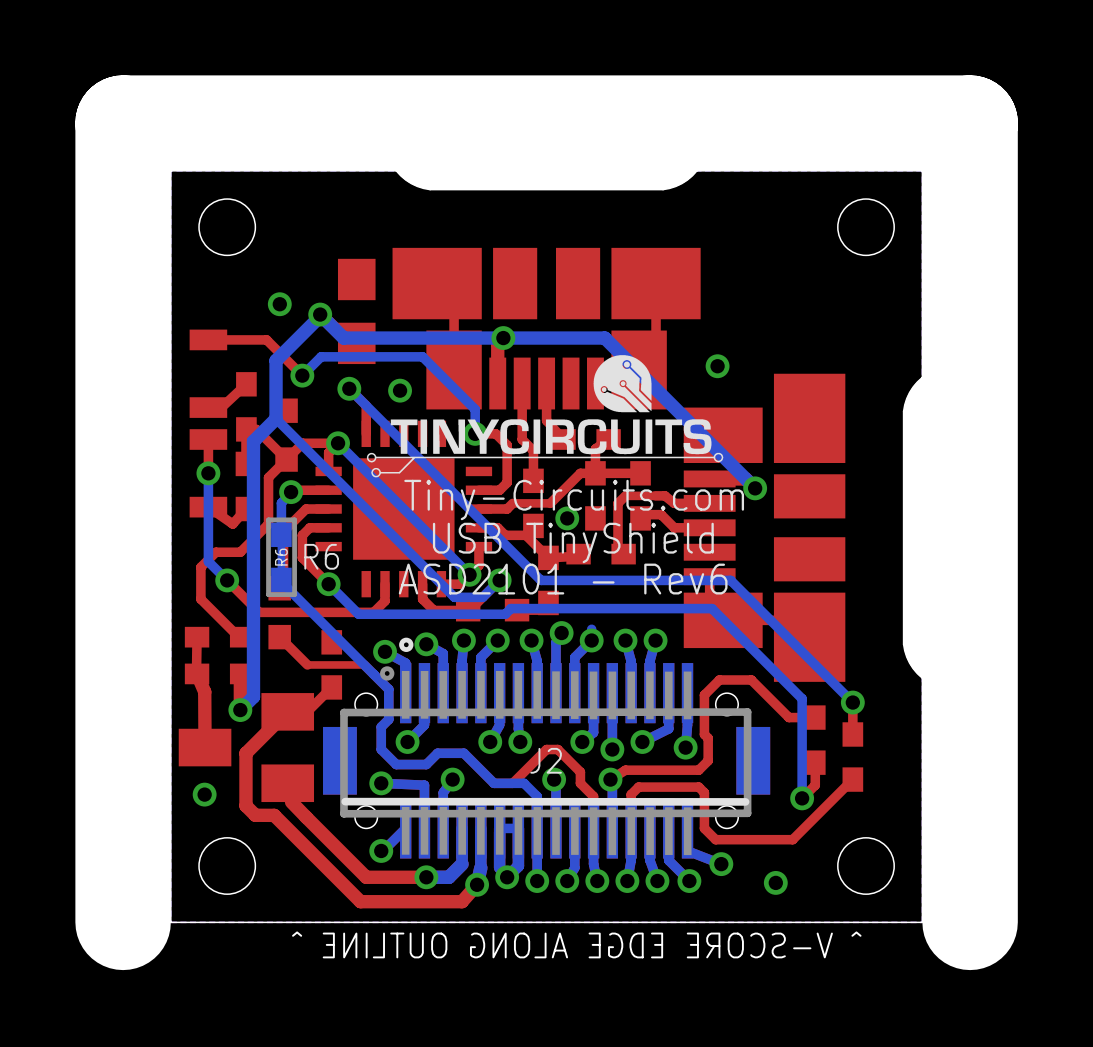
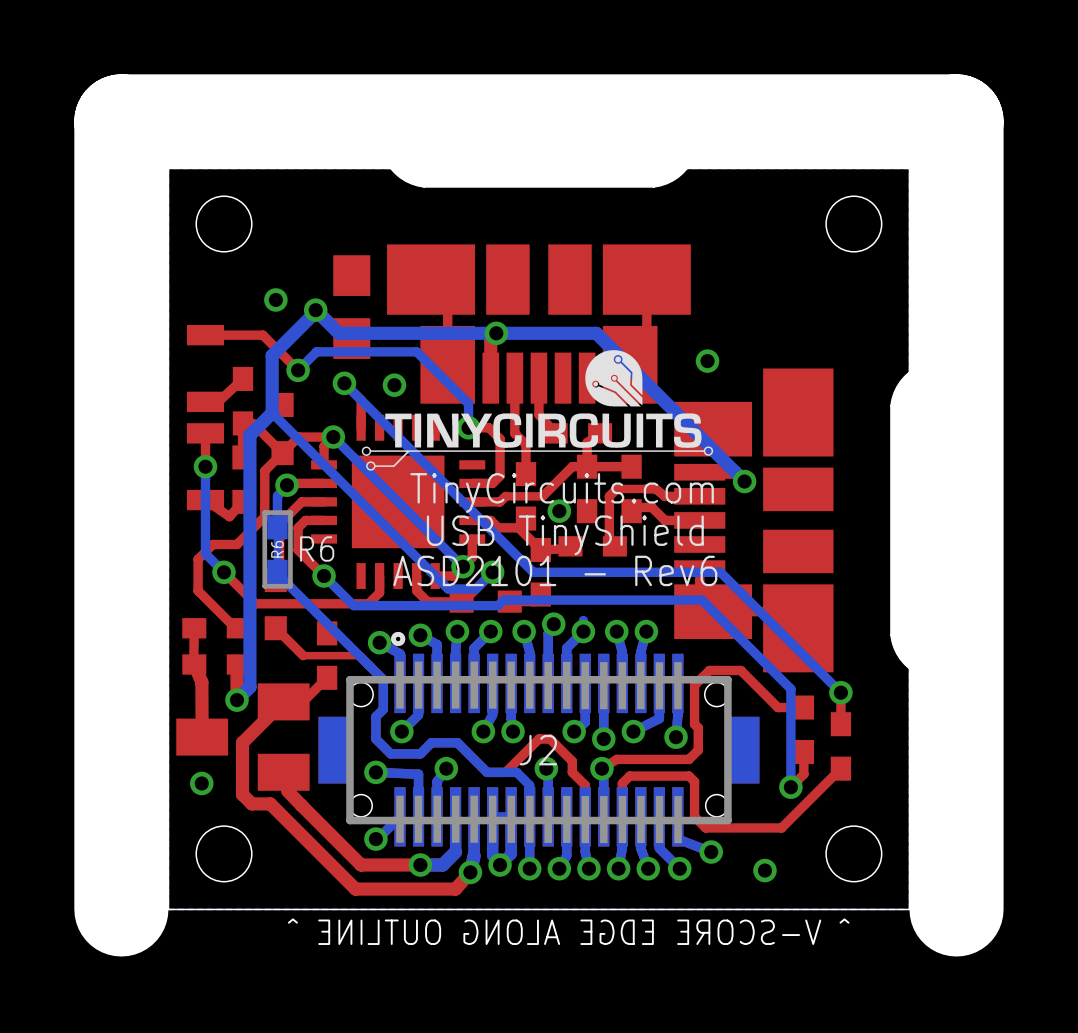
part footprint: [315, 420, 493, 598] -> [311, 414, 486, 589]
text: Tiny-Circuits.com (574, 500) -> TinyCircuits.com (562, 493)
J2 footprint: [323, 637, 771, 859] -> [318, 631, 760, 847]

